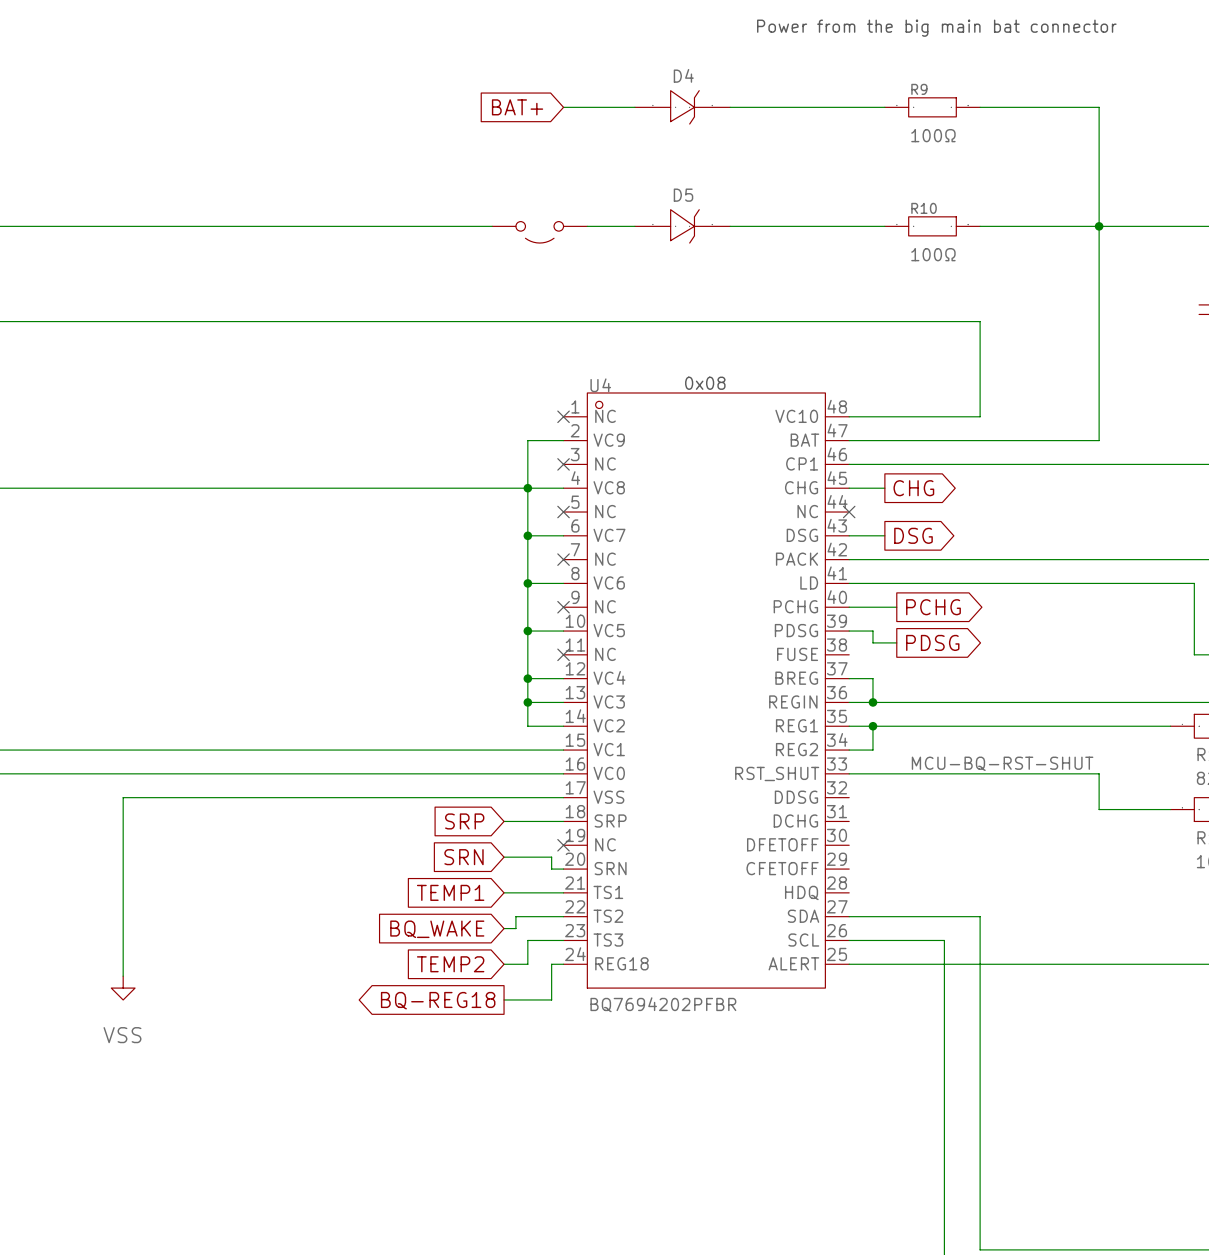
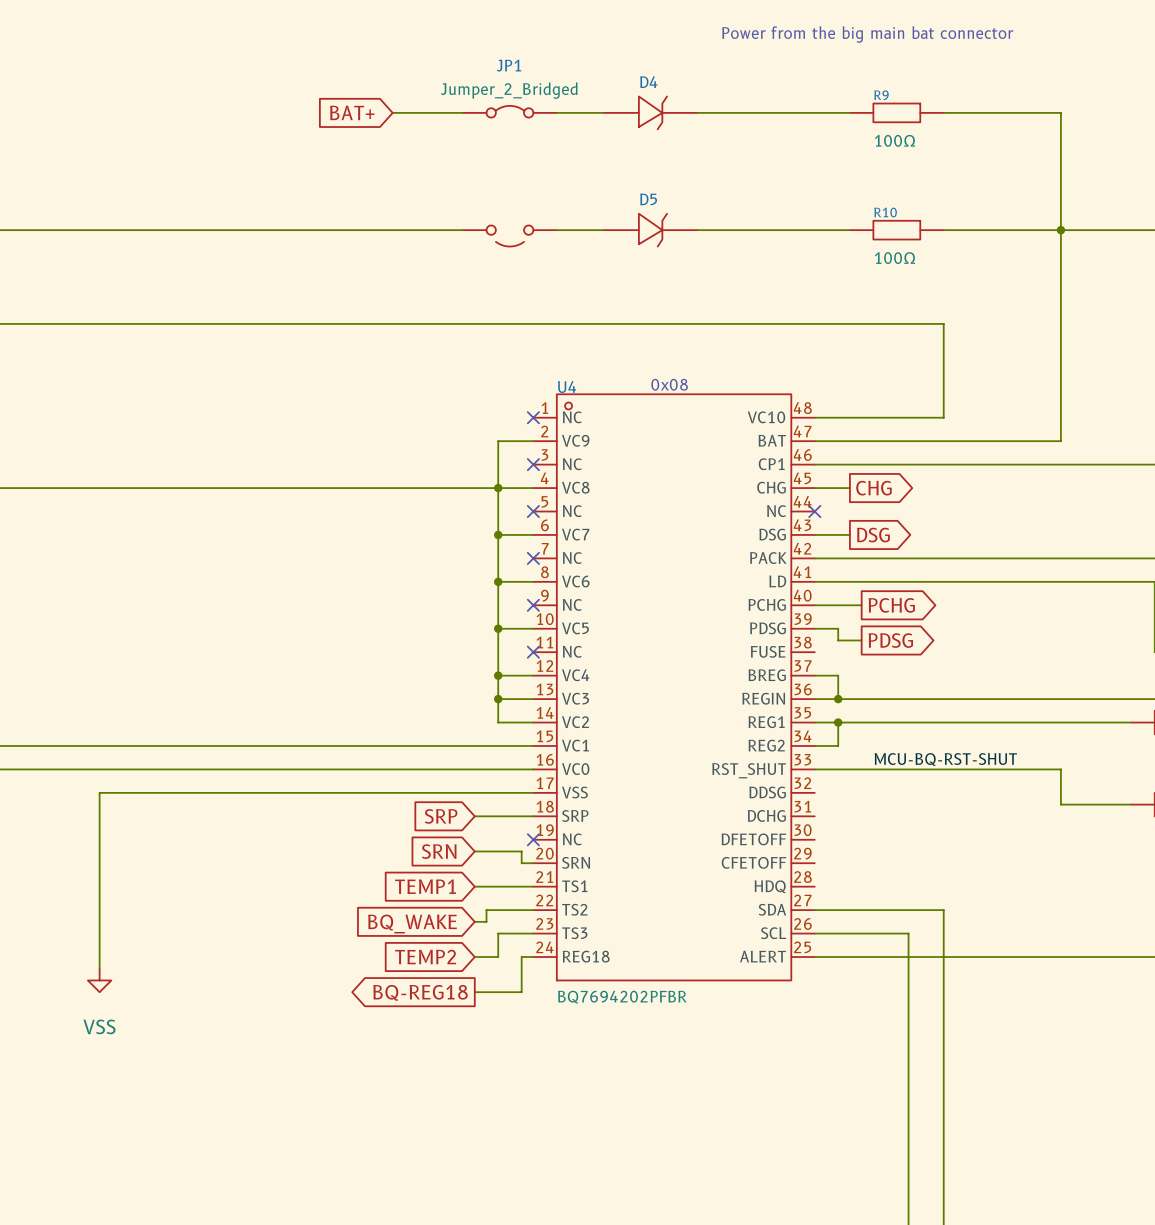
JP1: none -> Jumper_2_Bridged (509, 111)
wire: none -> (392, 112) (463, 112)
global label position: BAT+ (517, 107) -> BAT+ (352, 112)

